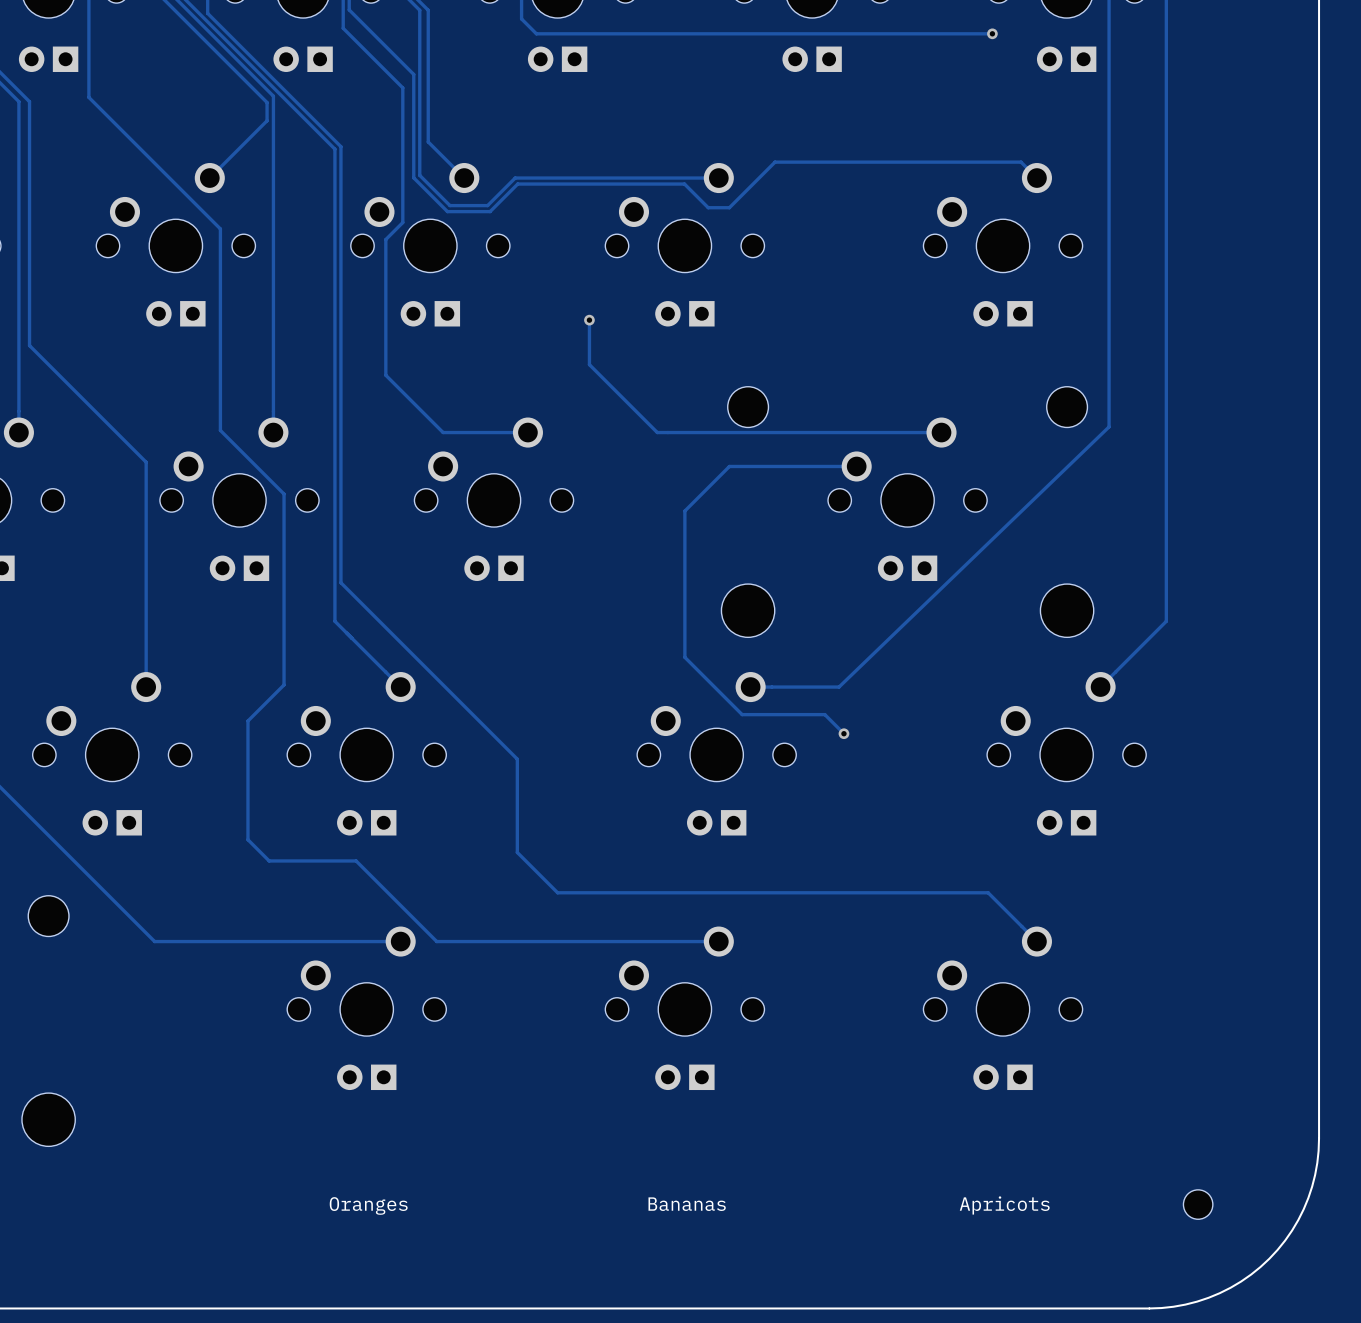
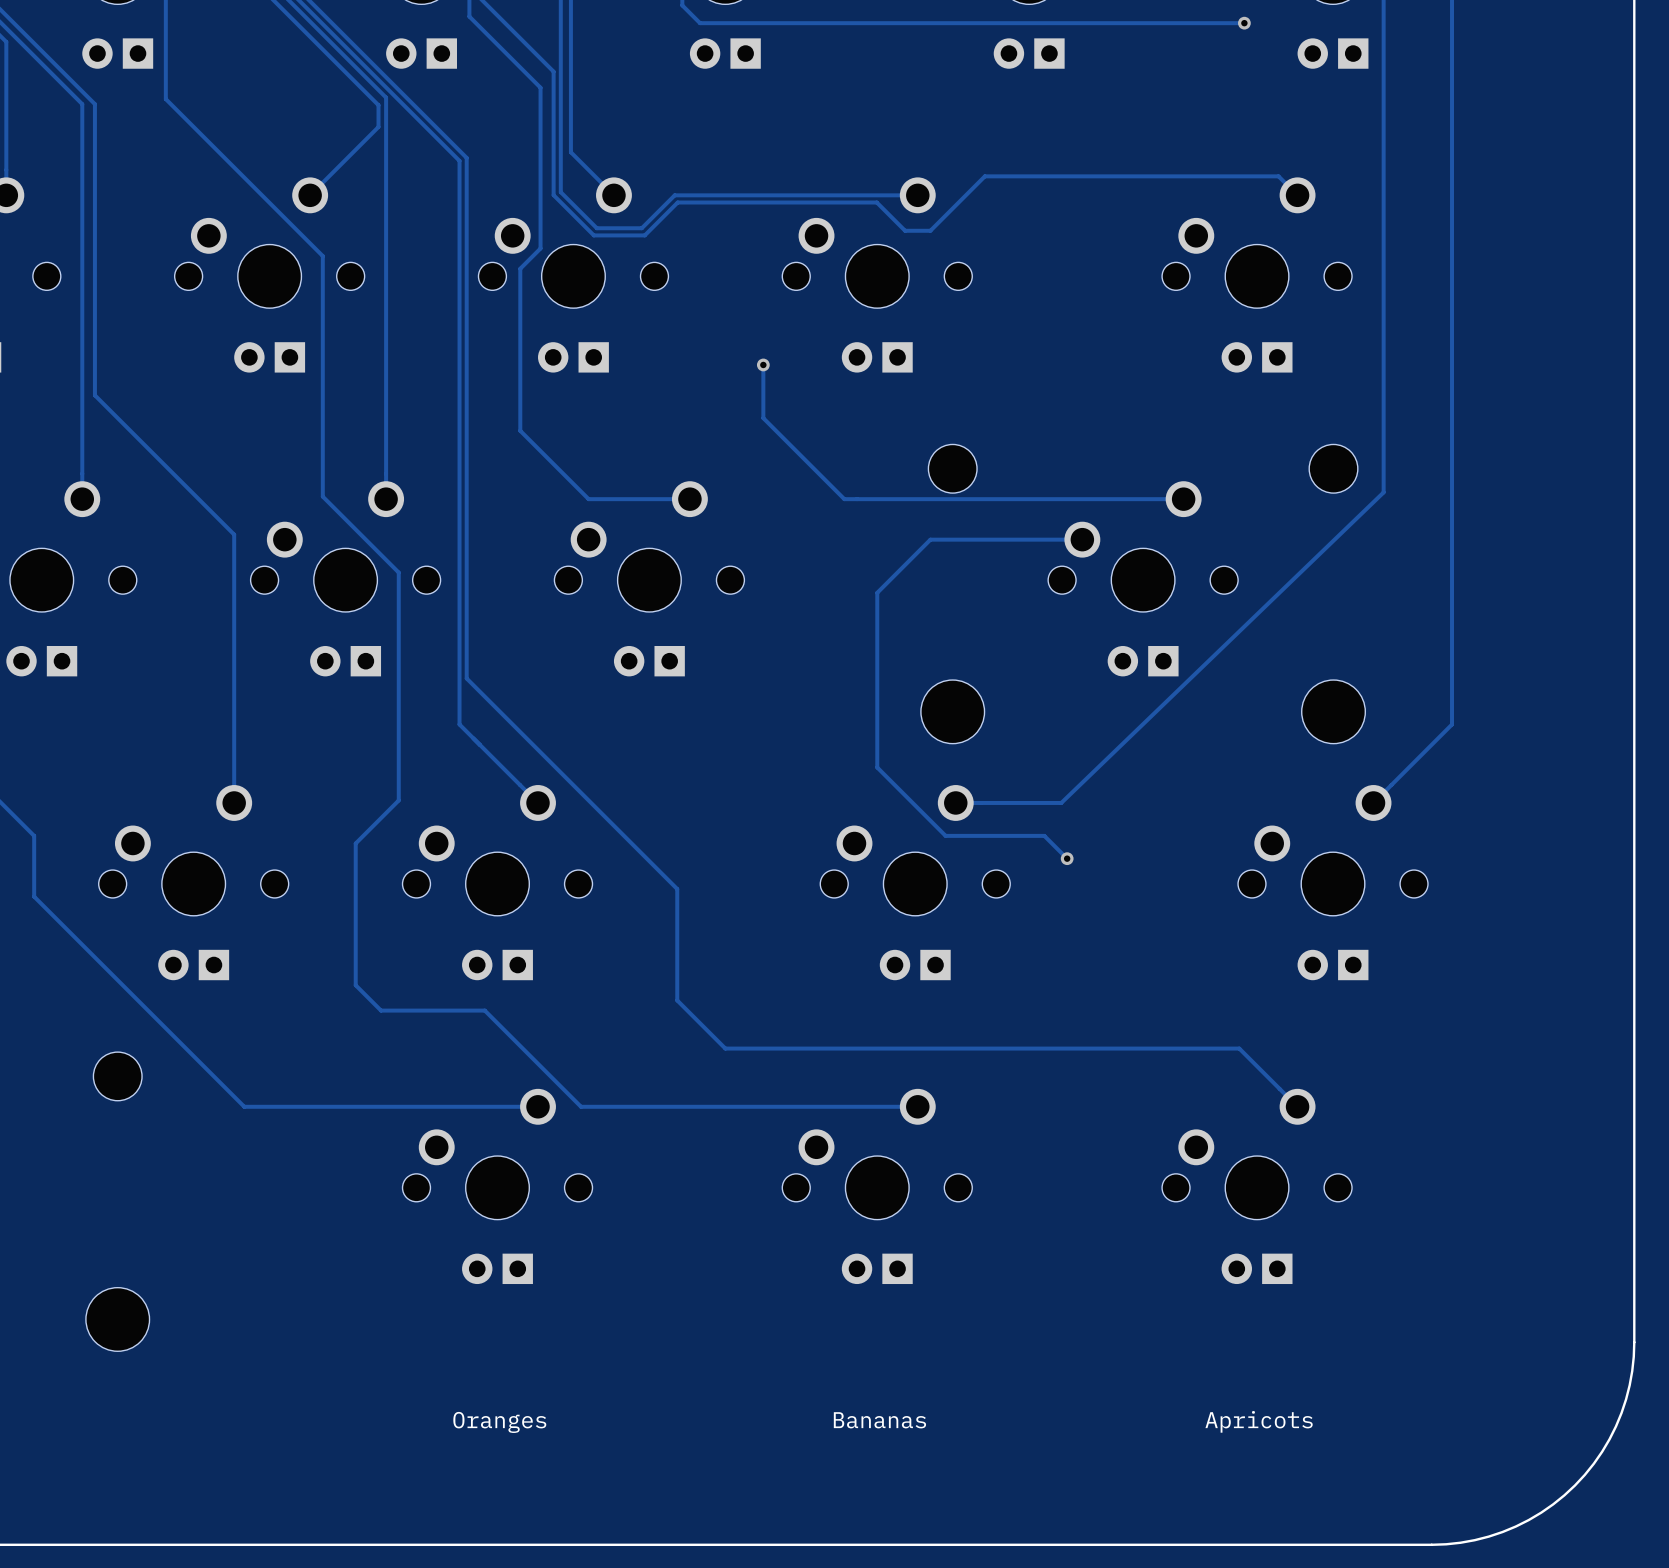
part: (1198, 1204) -> none

